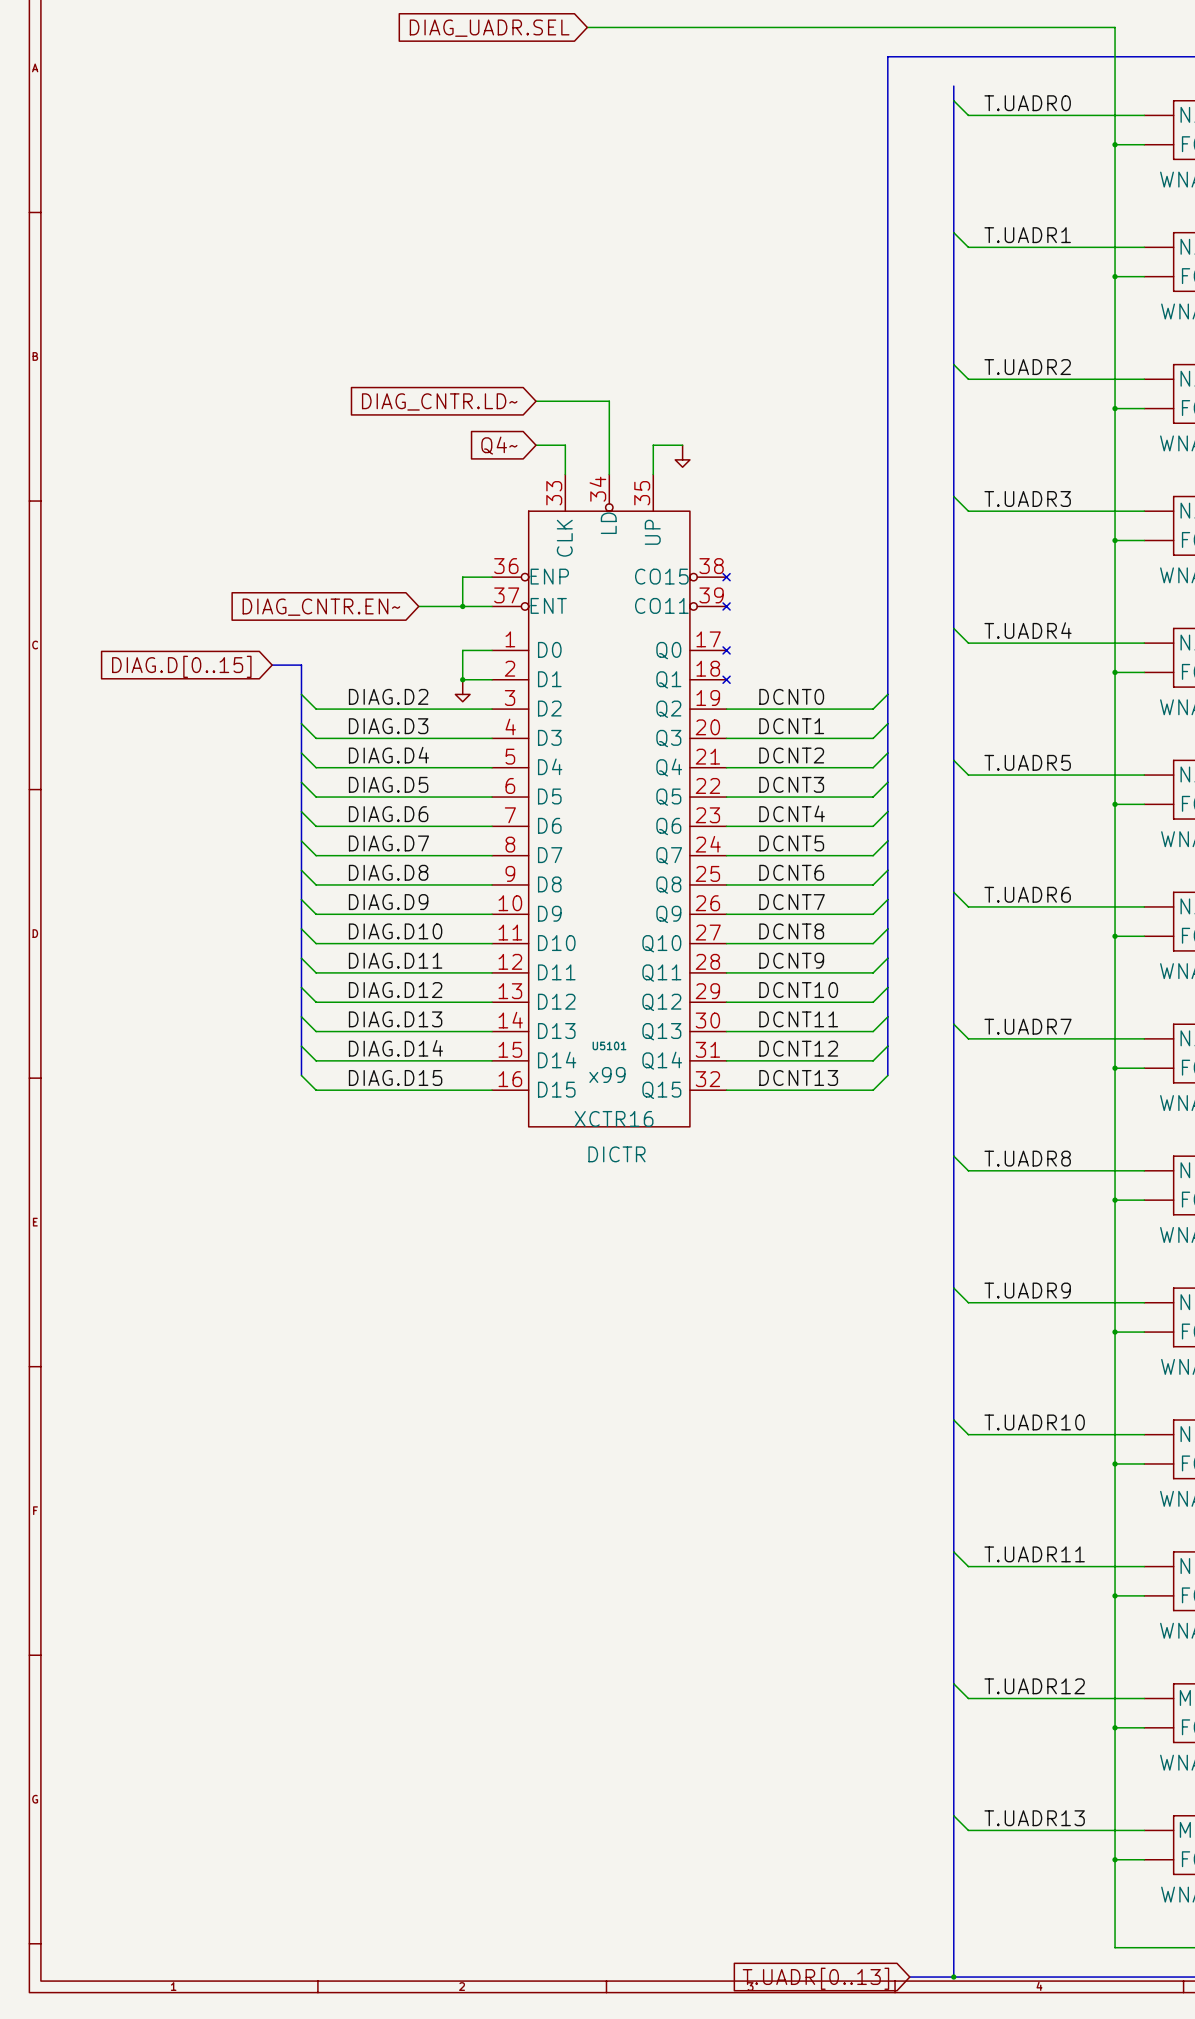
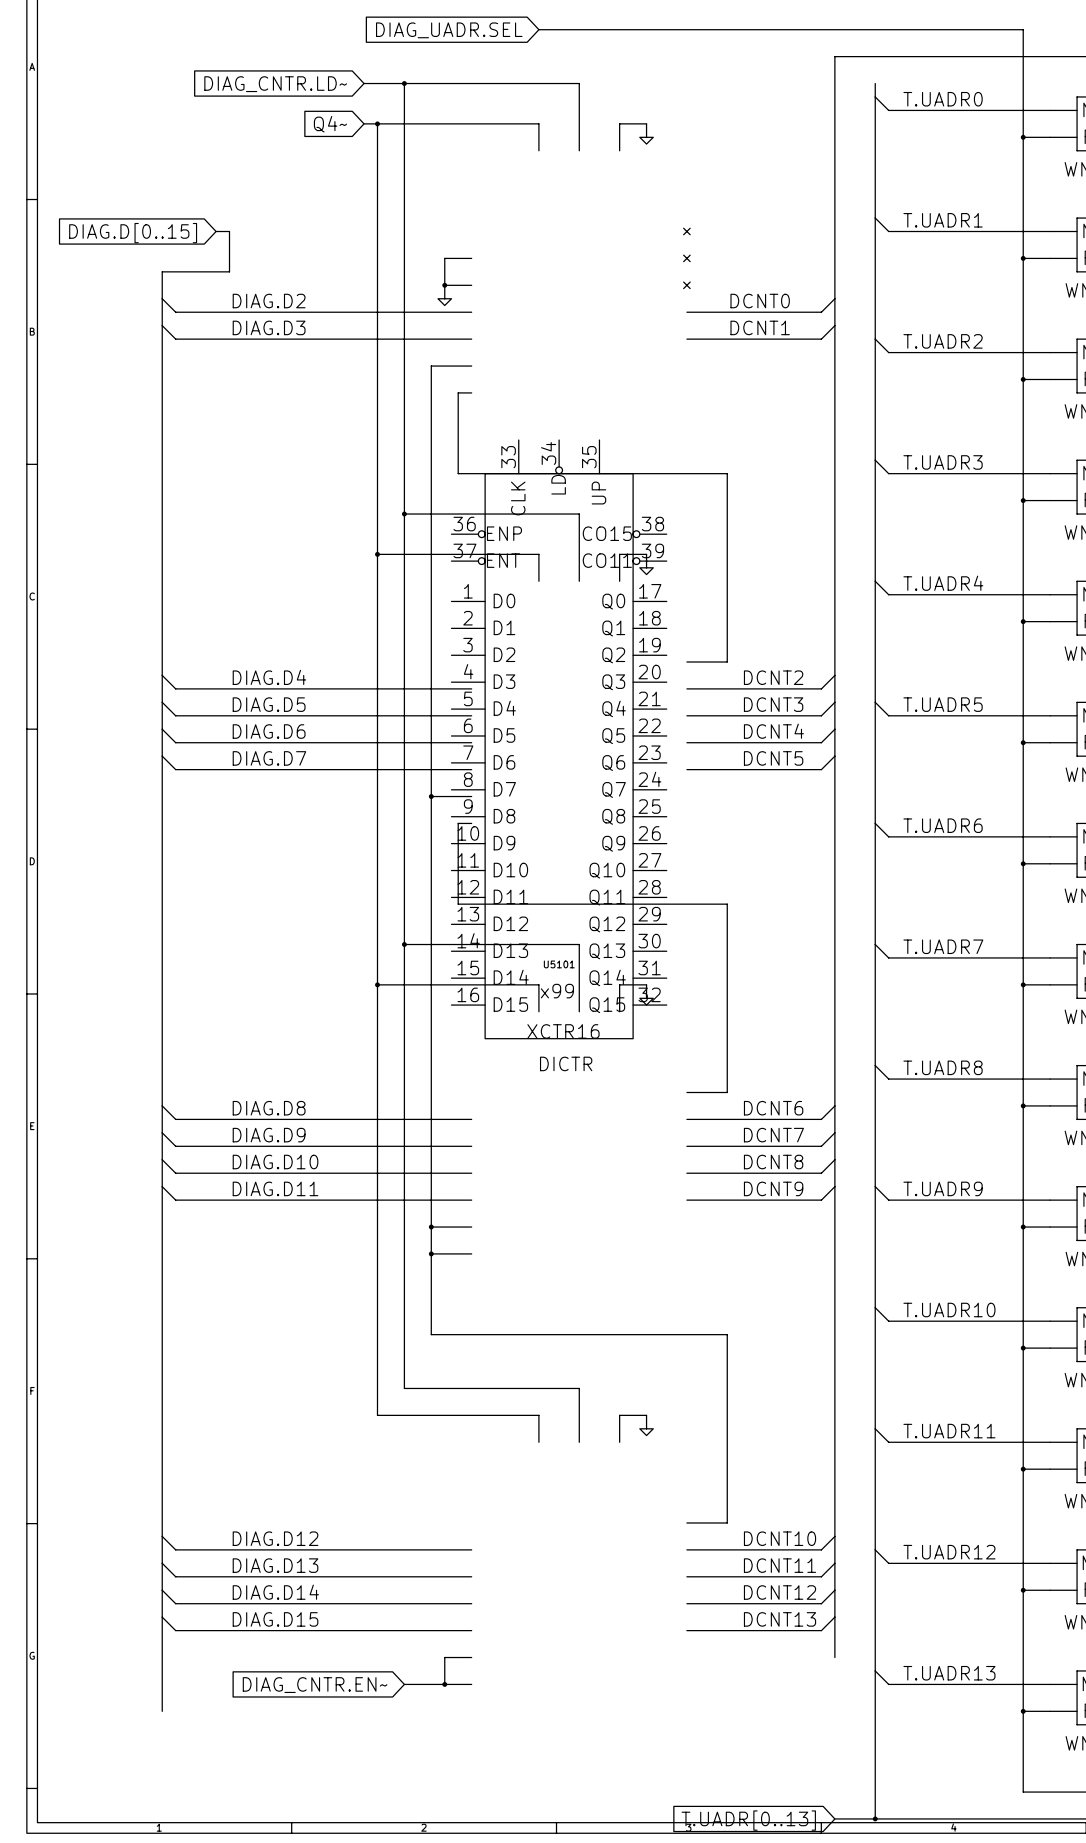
bus: (909, 56) (887, 56) (887, 1075) -> (834, 56) (834, 1657)
global label: none -> DIAG_CNTR.LD~ (275, 84)
wire: none -> (364, 83) (579, 83) (579, 150)
wire: none -> (404, 83) (404, 1388) (579, 1388) (579, 1442)
junction: none -> (404, 83)
global label: none -> Q4~ (330, 124)
wire: none -> (364, 123) (538, 123) (538, 150)
wire: none -> (377, 123) (377, 1415) (538, 1415) (538, 1442)
junction: none -> (377, 123)
wire: none -> (646, 123) (619, 123) (619, 150)
power symbol: none -> (646, 134)
bus: none -> (216, 231) (229, 231) (229, 271) (162, 271) (162, 1711)
no-connect mark: none -> (686, 231)
global label: none -> DIAG.D[0..15] (133, 233)
wire: none -> (471, 258) (444, 258) (444, 285) (471, 285)
no-connect mark: none -> (686, 258)
junction: none -> (444, 285)
no-connect mark: none -> (686, 285)
power symbol: none -> (444, 295)
wire: none -> (162, 298) (175, 312) (471, 312)
wire: none -> (834, 298) (821, 312) (686, 312)
label: none -> DIAG.D2 (269, 301)
label: none -> DCNT0 (760, 301)
wire: none -> (162, 325) (175, 339) (471, 339)
wire: none -> (834, 325) (821, 339) (686, 339)
label: none -> DIAG.D3 (269, 327)
label: none -> DCNT1 (760, 327)
wire: none -> (471, 366) (431, 366) (431, 1334) (727, 1334) (727, 1522) (686, 1522)
global label: DIAG_CNTR.LD~ (439, 401) -> none
wire: (536, 401) (609, 401) (609, 474) -> none
wire: none -> (471, 392) (458, 392) (458, 473) (727, 473) (727, 662) (686, 662)
global label: Q4~ (499, 445) -> none
wire: (536, 445) (565, 445) (565, 474) -> none
wire: (682, 445) (653, 445) (653, 474) -> none
power symbol: (682, 456) -> none
wire: none -> (404, 514) (579, 514) (579, 581)
junction: none -> (404, 514)
wire: (492, 577) (462, 577) (462, 606) -> none
no-connect mark: (726, 577) -> none
wire: none -> (377, 554) (538, 554) (538, 581)
junction: none -> (377, 554)
wire: none -> (646, 554) (619, 554) (619, 581)
wire: (418, 606) (492, 606) -> none
junction: (462, 606) -> none
no-connect mark: (726, 606) -> none
global label: DIAG_CNTR.EN~ (321, 607) -> none
power symbol: none -> (646, 564)
wire: (492, 650) (462, 650) (462, 679) (492, 679) -> none
no-connect mark: (726, 650) -> none
bus: (272, 665) (301, 665) (301, 1075) -> none
global label: DIAG.D[0..15] (181, 666) -> none
junction: (462, 679) -> none
no-connect mark: (726, 679) -> none
power symbol: (462, 690) -> none
wire: (301, 694) (316, 709) (492, 709) -> none
wire: (887, 694) (873, 709) (726, 709) -> none
label: DIAG.D2 (388, 696) -> none
label: DCNT0 (791, 696) -> none
wire: (301, 723) (316, 738) (492, 738) -> none
wire: (887, 723) (873, 738) (726, 738) -> (834, 675) (821, 688) (686, 688)
label: DIAG.D3 (388, 726) -> none
label: DCNT1 (791, 726) -> none
wire: none -> (162, 675) (175, 688) (471, 688)
wire: (301, 753) (316, 767) (492, 767) -> none
wire: (887, 753) (873, 767) (726, 767) -> (834, 702) (821, 715) (686, 715)
label position: DIAG.D4 (388, 755) -> DIAG.D4 (269, 677)
label position: DCNT2 (791, 755) -> DCNT2 (773, 677)
wire: none -> (162, 702) (175, 715) (471, 715)
wire: (301, 782) (316, 797) (492, 797) -> none
wire: (887, 782) (873, 797) (726, 797) -> (834, 729) (821, 742) (686, 742)
label position: DIAG.D5 (388, 784) -> DIAG.D5 (269, 704)
label position: DCNT3 (791, 784) -> DCNT3 (773, 704)
wire: none -> (162, 729) (175, 742) (471, 742)
wire: (301, 811) (316, 826) (492, 826) -> none
wire: (887, 811) (873, 826) (726, 826) -> (834, 756) (821, 769) (686, 769)
label position: DCNT4 (792, 813) -> DCNT4 (773, 731)
label position: DIAG.D6 (388, 814) -> DIAG.D6 (269, 731)
wire: none -> (162, 756) (175, 769) (471, 769)
wire: (301, 841) (316, 855) (492, 855) -> none
wire: (887, 841) (873, 855) (726, 855) -> none
label position: DIAG.D7 (388, 843) -> DIAG.D7 (269, 758)
label position: DCNT5 (791, 843) -> DCNT5 (773, 758)
wire: none -> (431, 796) (471, 796)
junction: none -> (431, 796)
wire: (301, 870) (316, 884) (492, 884) -> none
wire: (887, 870) (873, 884) (726, 884) -> none
label: DIAG.D8 (388, 872) -> none
label: DCNT6 (791, 872) -> none
wire: none -> (471, 823) (458, 823) (458, 904) (727, 904) (727, 1092) (686, 1092)
wire: (301, 899) (316, 914) (492, 914) -> none
wire: (887, 899) (873, 914) (726, 914) -> none
label: DIAG.D9 (388, 902) -> none
label: DCNT7 (792, 902) -> none
wire: (301, 928) (316, 943) (492, 943) -> none
wire: (887, 928) (873, 943) (726, 943) -> none
label: DIAG.D10 (395, 931) -> none
label: DCNT8 (791, 931) -> none
wire: (301, 958) (316, 972) (492, 972) -> none
wire: (887, 958) (873, 972) (726, 972) -> none
label: DIAG.D11 (395, 960) -> none
label: DCNT9 (791, 960) -> none
wire: (301, 987) (316, 1002) (492, 1002) -> none
wire: (887, 987) (873, 1002) (726, 1002) -> none
label: DIAG.D12 (395, 990) -> none
label: DCNT10 (798, 990) -> none
wire: (301, 1016) (316, 1031) (492, 1031) -> none
wire: (887, 1016) (873, 1031) (726, 1031) -> none
label: DIAG.D13 (395, 1019) -> none
label: DCNT11 (798, 1019) -> none
wire: none -> (404, 944) (579, 944) (579, 1011)
junction: none -> (404, 944)
wire: (301, 1046) (316, 1060) (492, 1060) -> none
wire: (887, 1046) (873, 1060) (726, 1060) -> none
label: DIAG.D14 (395, 1048) -> none
label: DCNT12 (798, 1048) -> none
wire: none -> (377, 984) (538, 984) (538, 1011)
junction: none -> (377, 984)
wire: none -> (646, 984) (619, 984) (619, 1011)
wire: (301, 1075) (316, 1090) (492, 1090) -> none
wire: (887, 1075) (873, 1090) (726, 1090) -> (834, 1105) (821, 1119) (686, 1119)
label: DIAG.D15 (395, 1077) -> none
label: DCNT13 (798, 1077) -> none
power symbol: none -> (646, 995)
wire: none -> (162, 1105) (175, 1119) (471, 1119)
label: none -> DIAG.D8 (269, 1108)
label: none -> DCNT6 (773, 1108)
wire: none -> (162, 1132) (175, 1146) (471, 1146)
wire: none -> (834, 1132) (821, 1146) (686, 1146)
label: none -> DIAG.D9 (269, 1135)
label: none -> DCNT7 (773, 1135)
wire: none -> (162, 1159) (175, 1173) (471, 1173)
wire: none -> (834, 1159) (821, 1173) (686, 1173)
label: none -> DIAG.D10 (275, 1162)
label: none -> DCNT8 (773, 1162)
wire: none -> (162, 1186) (175, 1200) (471, 1200)
wire: none -> (834, 1186) (821, 1200) (686, 1200)
label: none -> DIAG.D11 (275, 1188)
label: none -> DCNT9 (773, 1188)
wire: none -> (431, 1227) (471, 1227)
junction: none -> (431, 1227)
wire: none -> (431, 1253) (471, 1253)
junction: none -> (431, 1253)
wire: none -> (646, 1415) (619, 1415) (619, 1442)
power symbol: none -> (646, 1425)
wire: none -> (162, 1536) (175, 1549) (471, 1549)
wire: none -> (834, 1536) (821, 1549) (686, 1549)
label: none -> DIAG.D12 (275, 1538)
label: none -> DCNT10 (780, 1538)
wire: none -> (162, 1563) (175, 1576) (471, 1576)
wire: none -> (834, 1563) (821, 1576) (686, 1576)
label: none -> DIAG.D13 (275, 1565)
label: none -> DCNT11 (780, 1565)
wire: none -> (162, 1590) (175, 1603) (471, 1603)
wire: none -> (834, 1590) (821, 1603) (686, 1603)
label: none -> DIAG.D14 (275, 1592)
label: none -> DCNT12 (780, 1592)
wire: none -> (162, 1617) (175, 1630) (471, 1630)
wire: none -> (834, 1617) (821, 1630) (686, 1630)
label: none -> DIAG.D15 (275, 1619)
label: none -> DCNT13 (780, 1619)
wire: none -> (471, 1657) (444, 1657) (444, 1684)
wire: none -> (404, 1684) (471, 1684)
junction: none -> (444, 1684)
global label: none -> DIAG_CNTR.EN~ (315, 1685)

